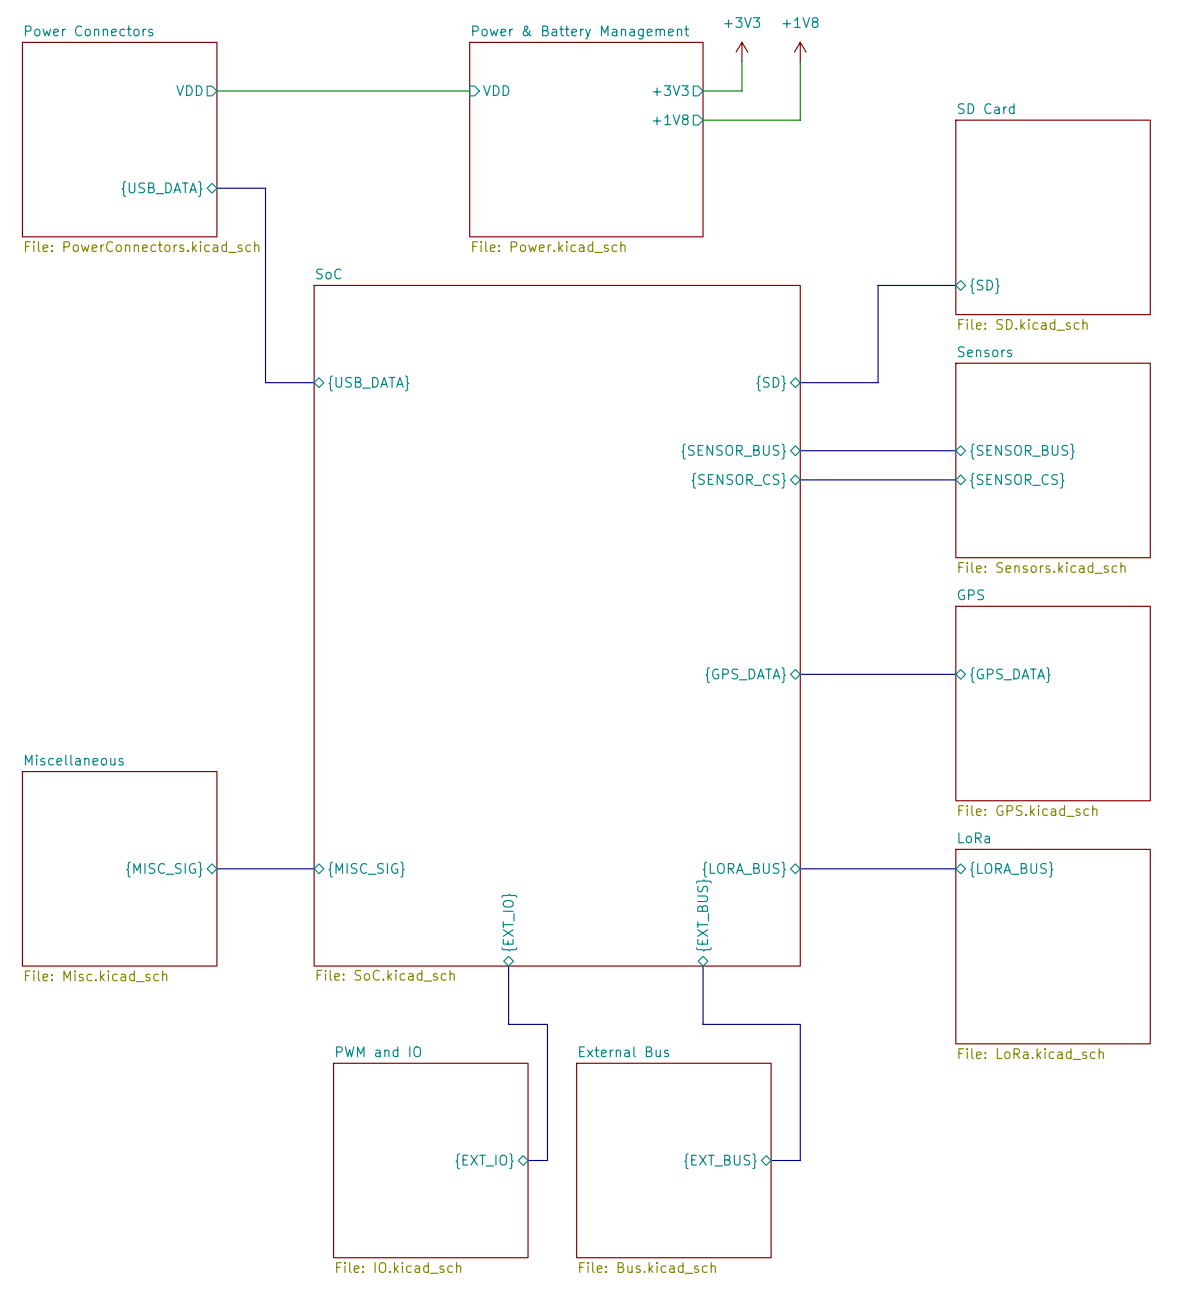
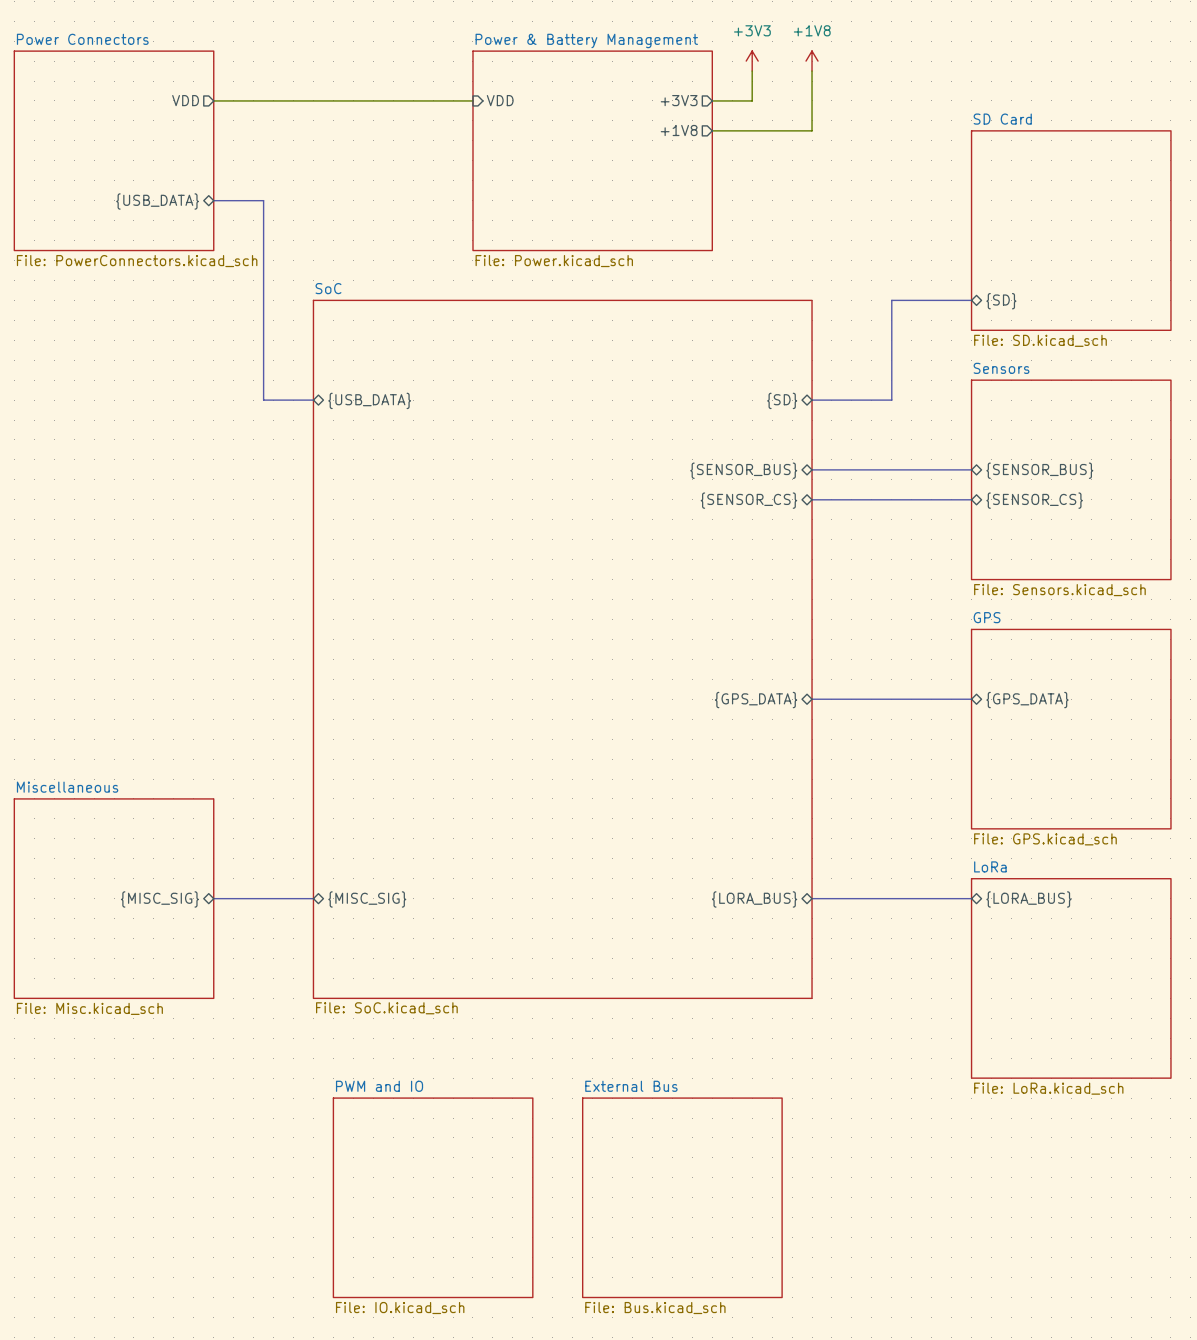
sheet pin: {EXT_BUS} (703, 915) -> none
sheet pin: {EXT_IO} (509, 922) -> none
bus: (508, 966) (508, 1024) (547, 1024) (547, 1160) (528, 1160) -> none
bus: (703, 966) (703, 1024) (800, 1024) (800, 1160) (771, 1160) -> none
sheet pin: {EXT_IO} (484, 1161) -> none
sheet pin: {EXT_BUS} (720, 1161) -> none

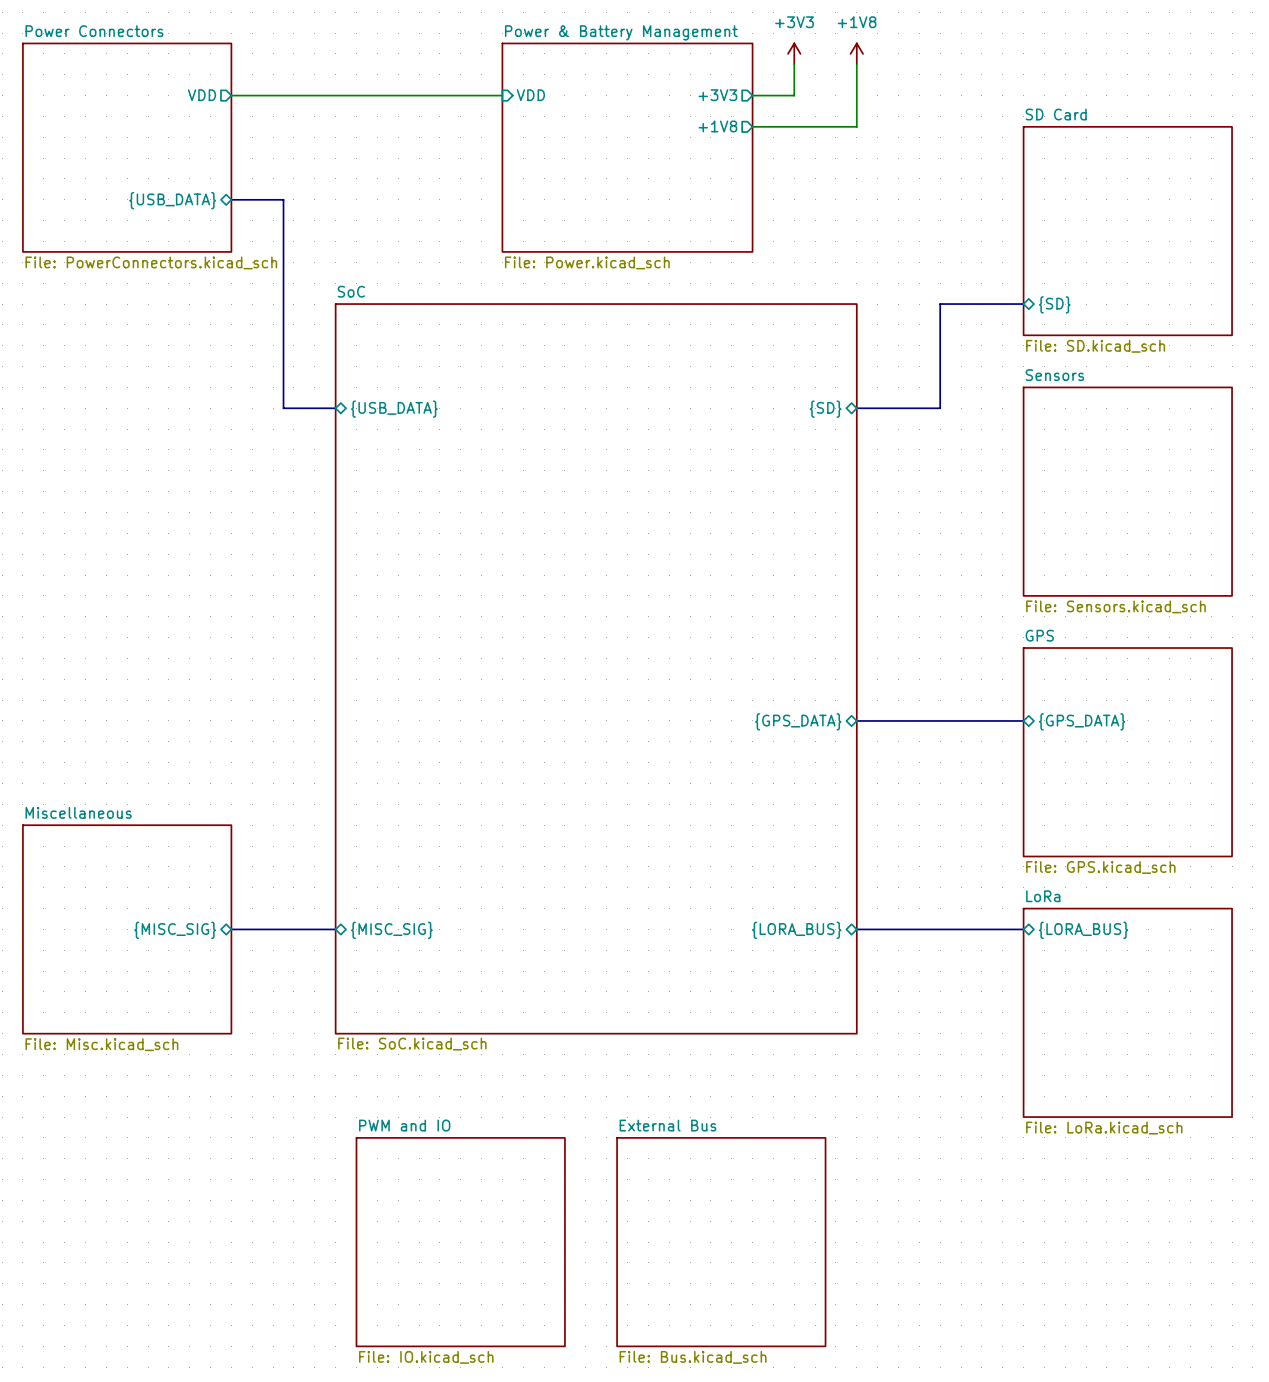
bus: (812, 469) (971, 469) -> none
sheet pin: {SENSOR_BUS} (743, 470) -> none
sheet pin: {SENSOR_BUS} (1039, 470) -> none
bus: (812, 499) (971, 499) -> none
sheet pin: {SENSOR_CS} (748, 500) -> none
sheet pin: {SENSOR_CS} (1034, 500) -> none

